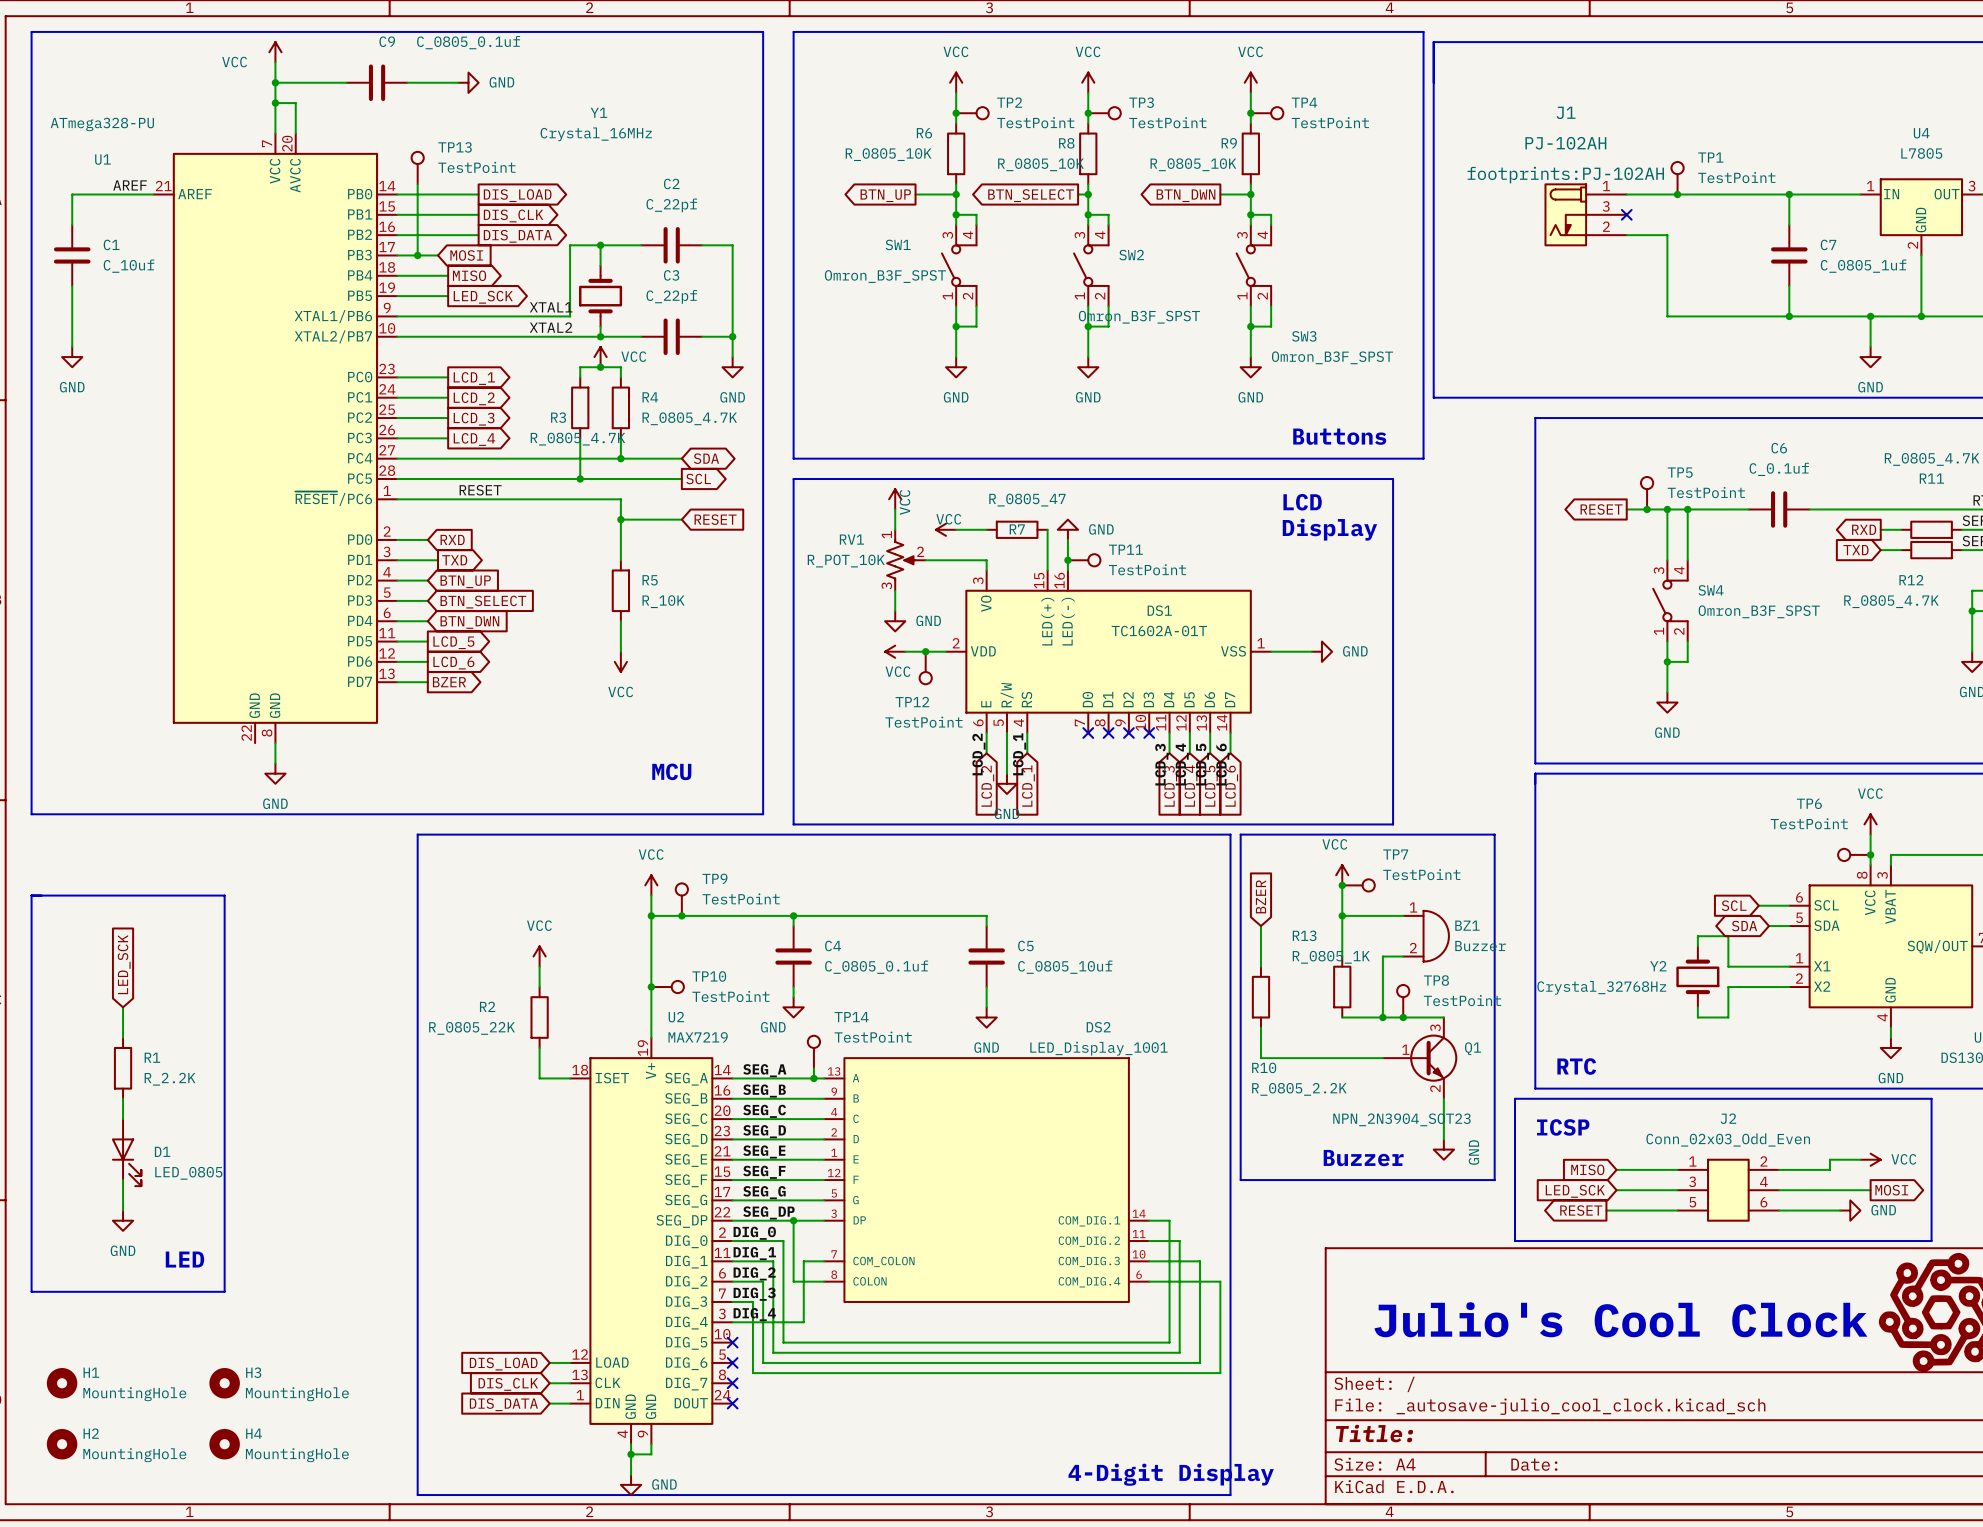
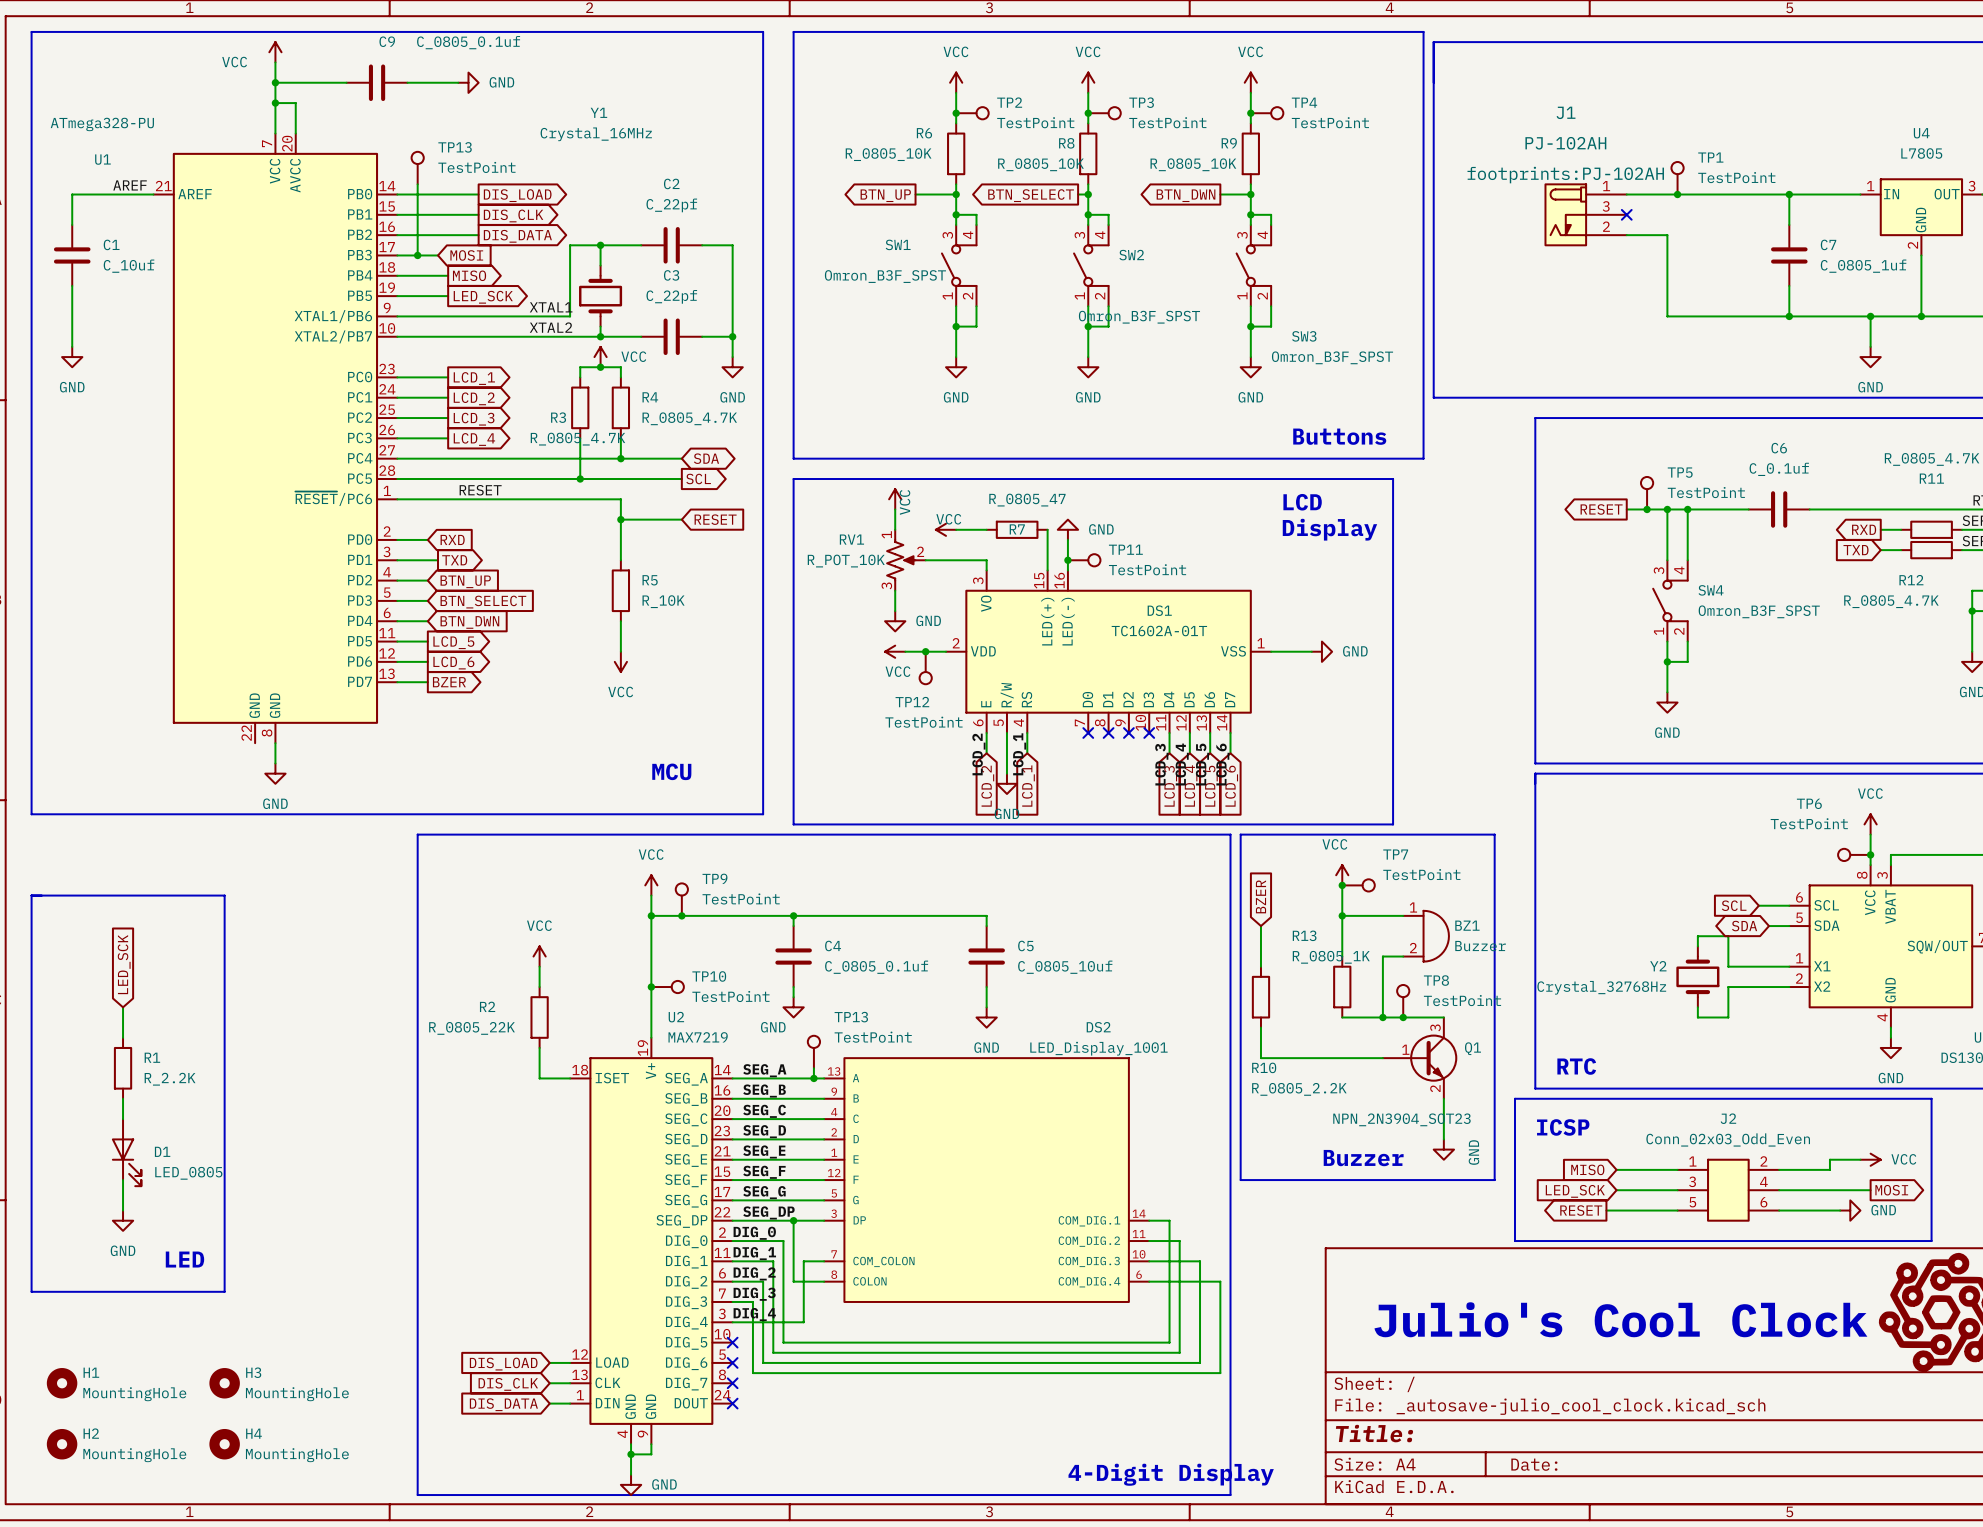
TP14 name: TP14 (851, 1017) -> TP13 (851, 1017)

